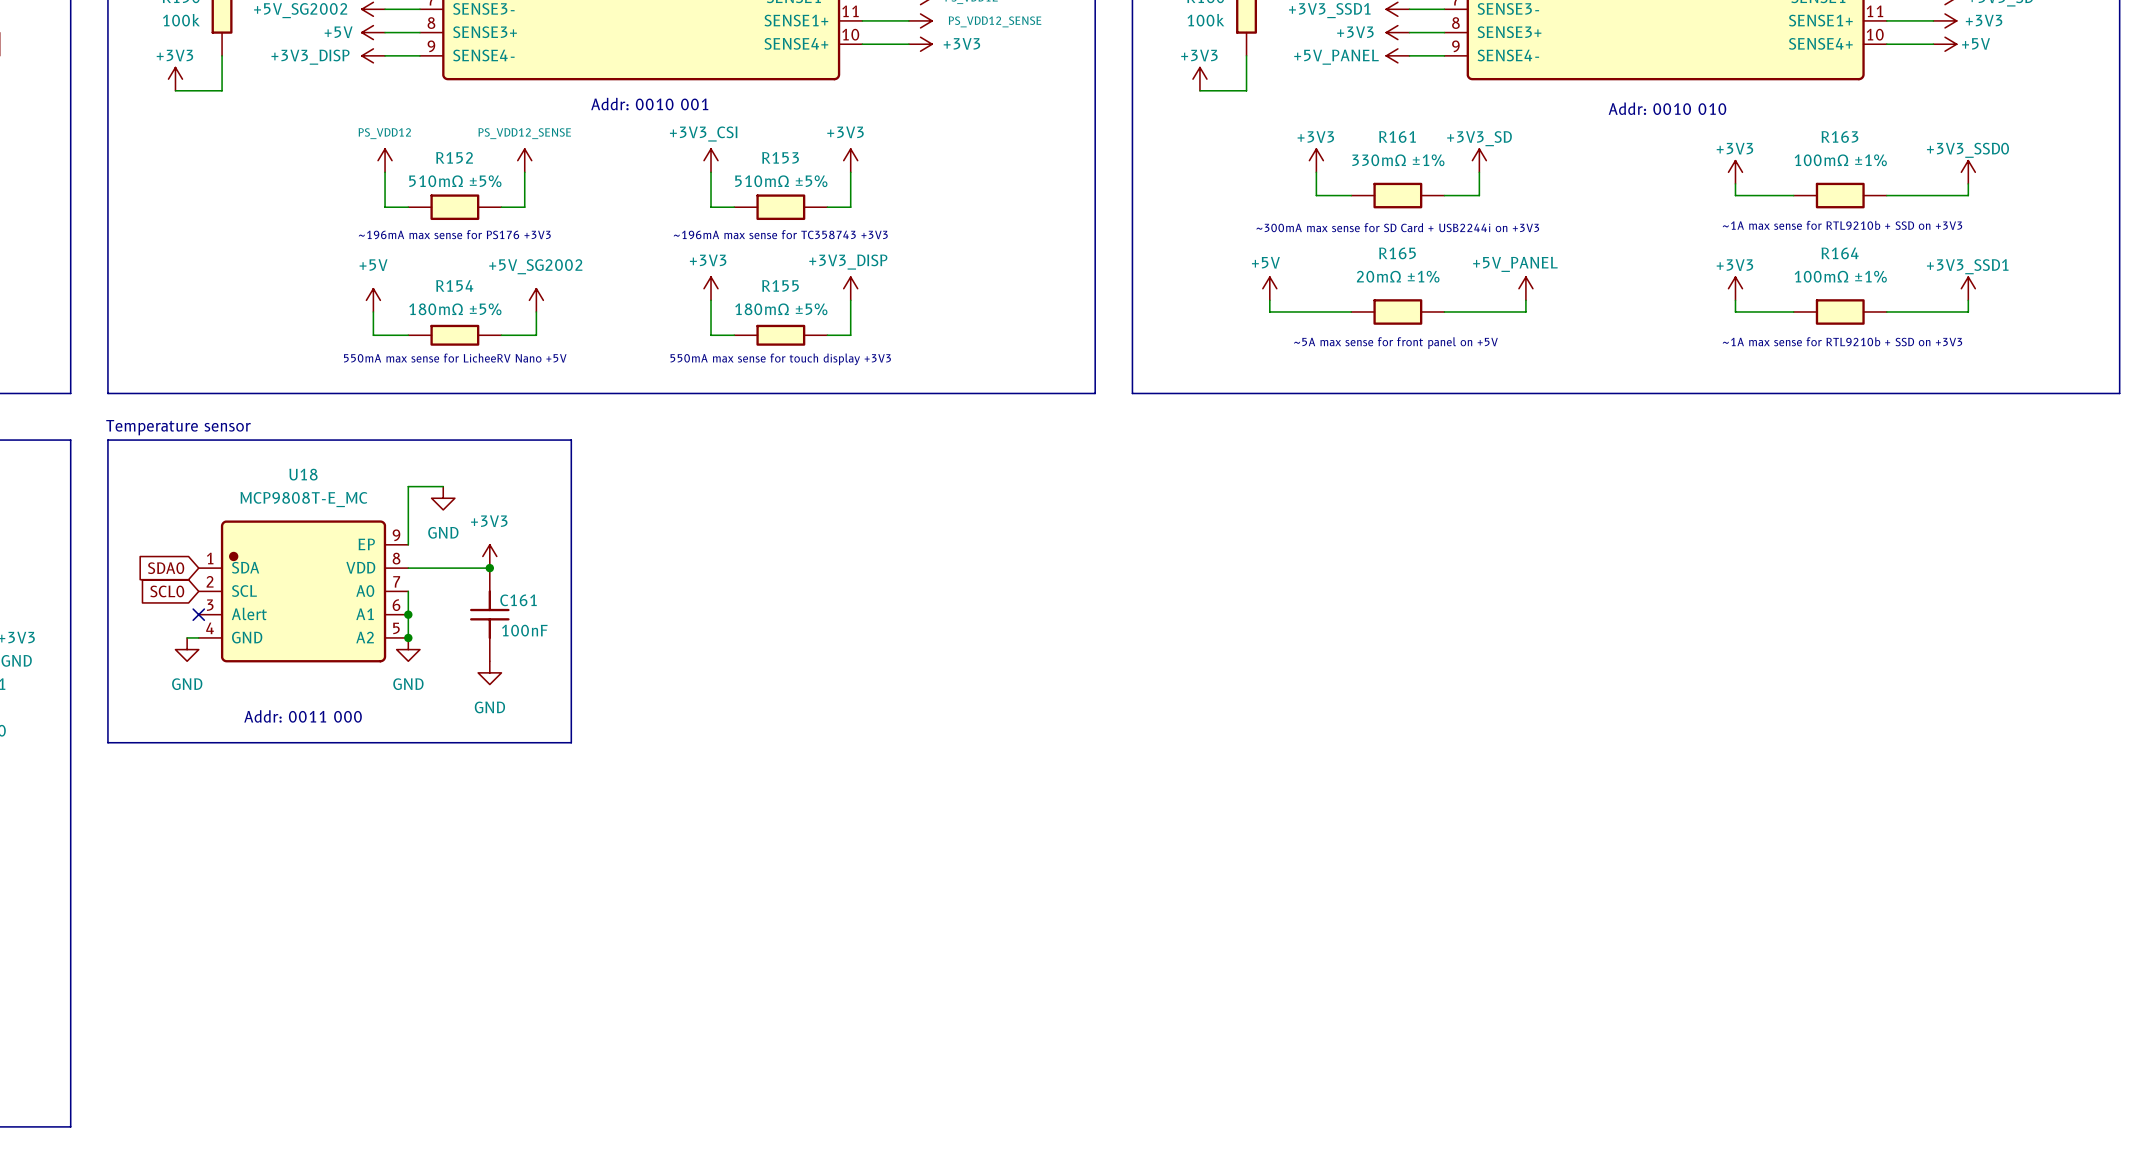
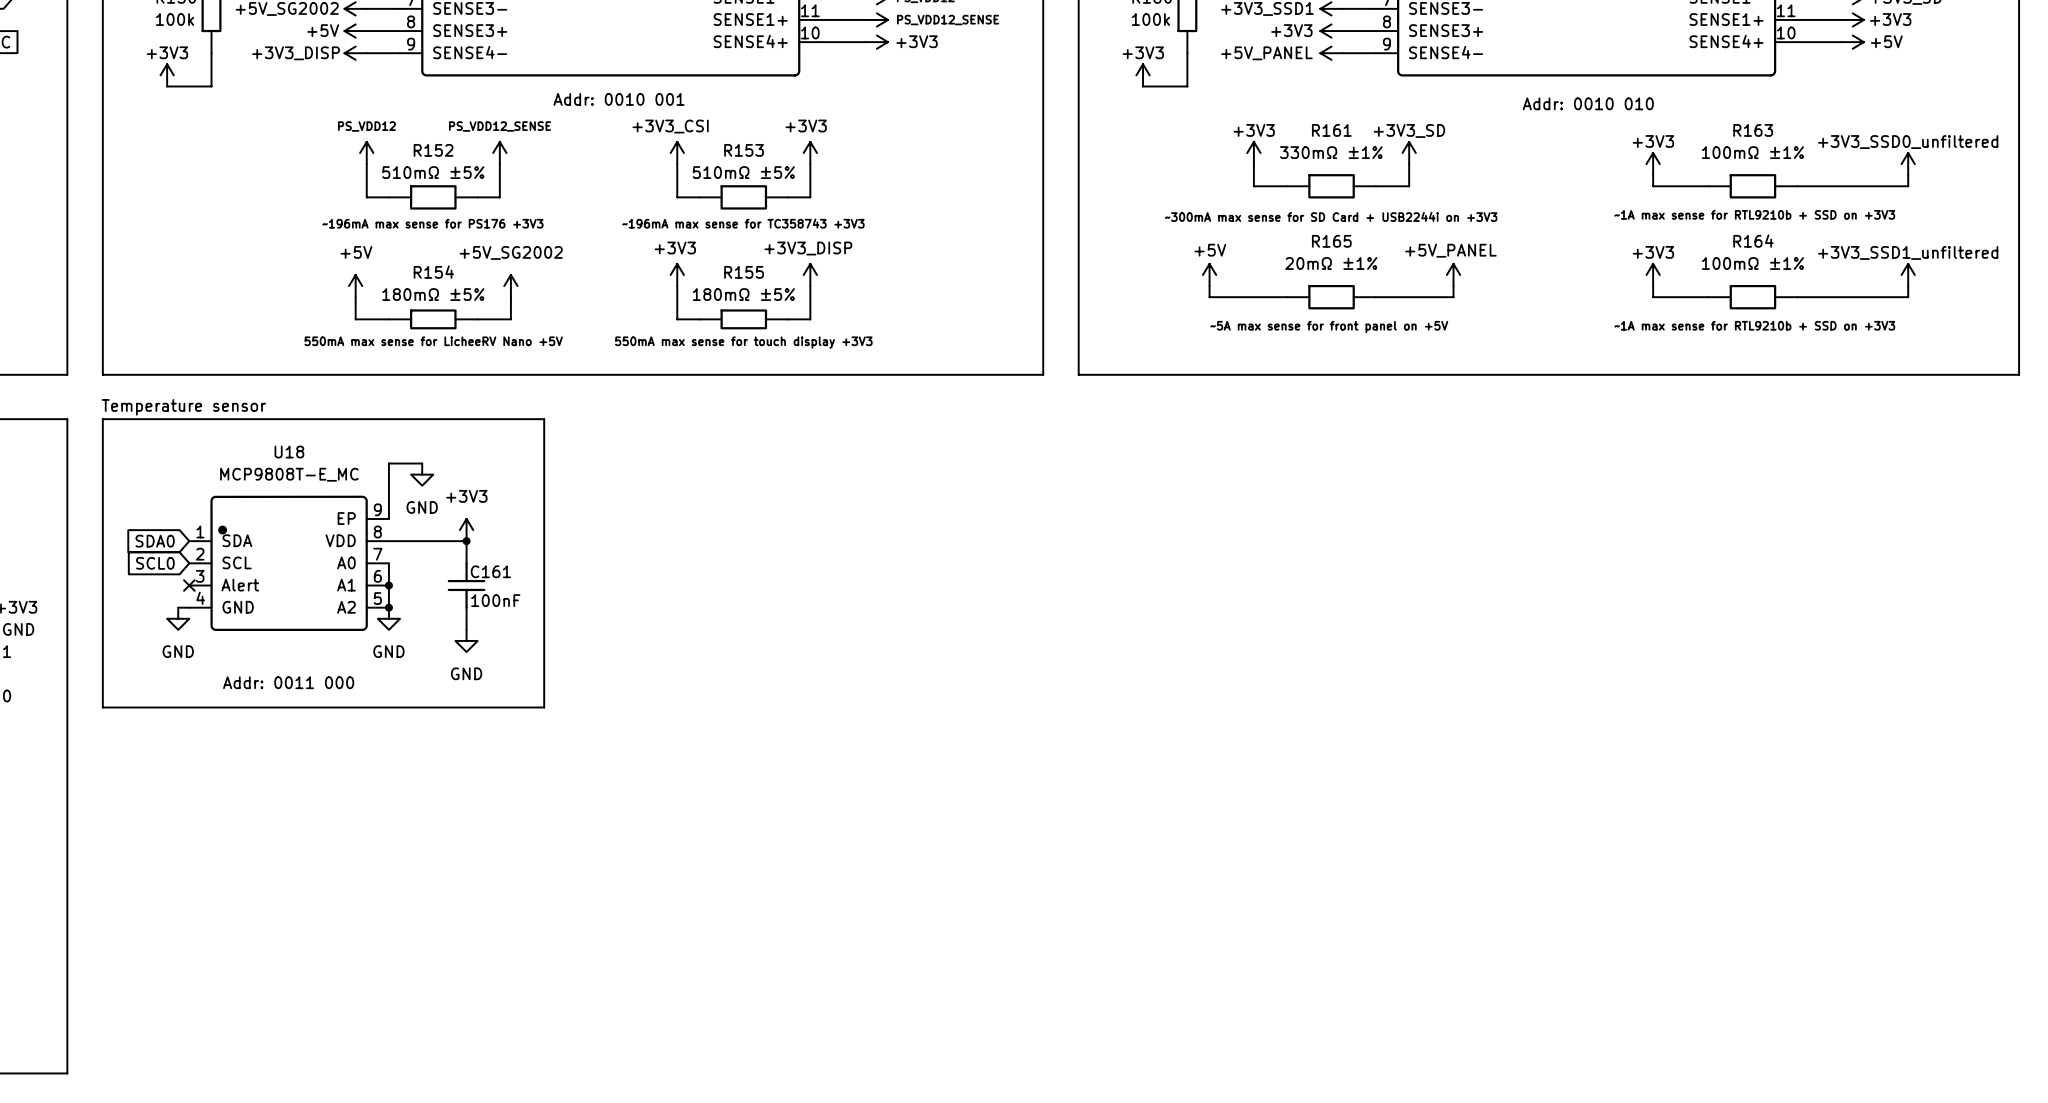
power symbol: +3V3_SSD0 (1968, 172) -> none
power symbol: none -> +3V3_SSD0_unfiltered (1908, 164)
wire: (1968, 183) (1968, 195) -> (1908, 175) (1908, 186) (1874, 186)
power symbol: +3V3_SSD1 (1968, 288) -> none
power symbol: none -> +3V3_SSD1_unfiltered (1908, 275)
wire: (1968, 300) (1968, 311) -> (1908, 286) (1908, 297) (1874, 297)

